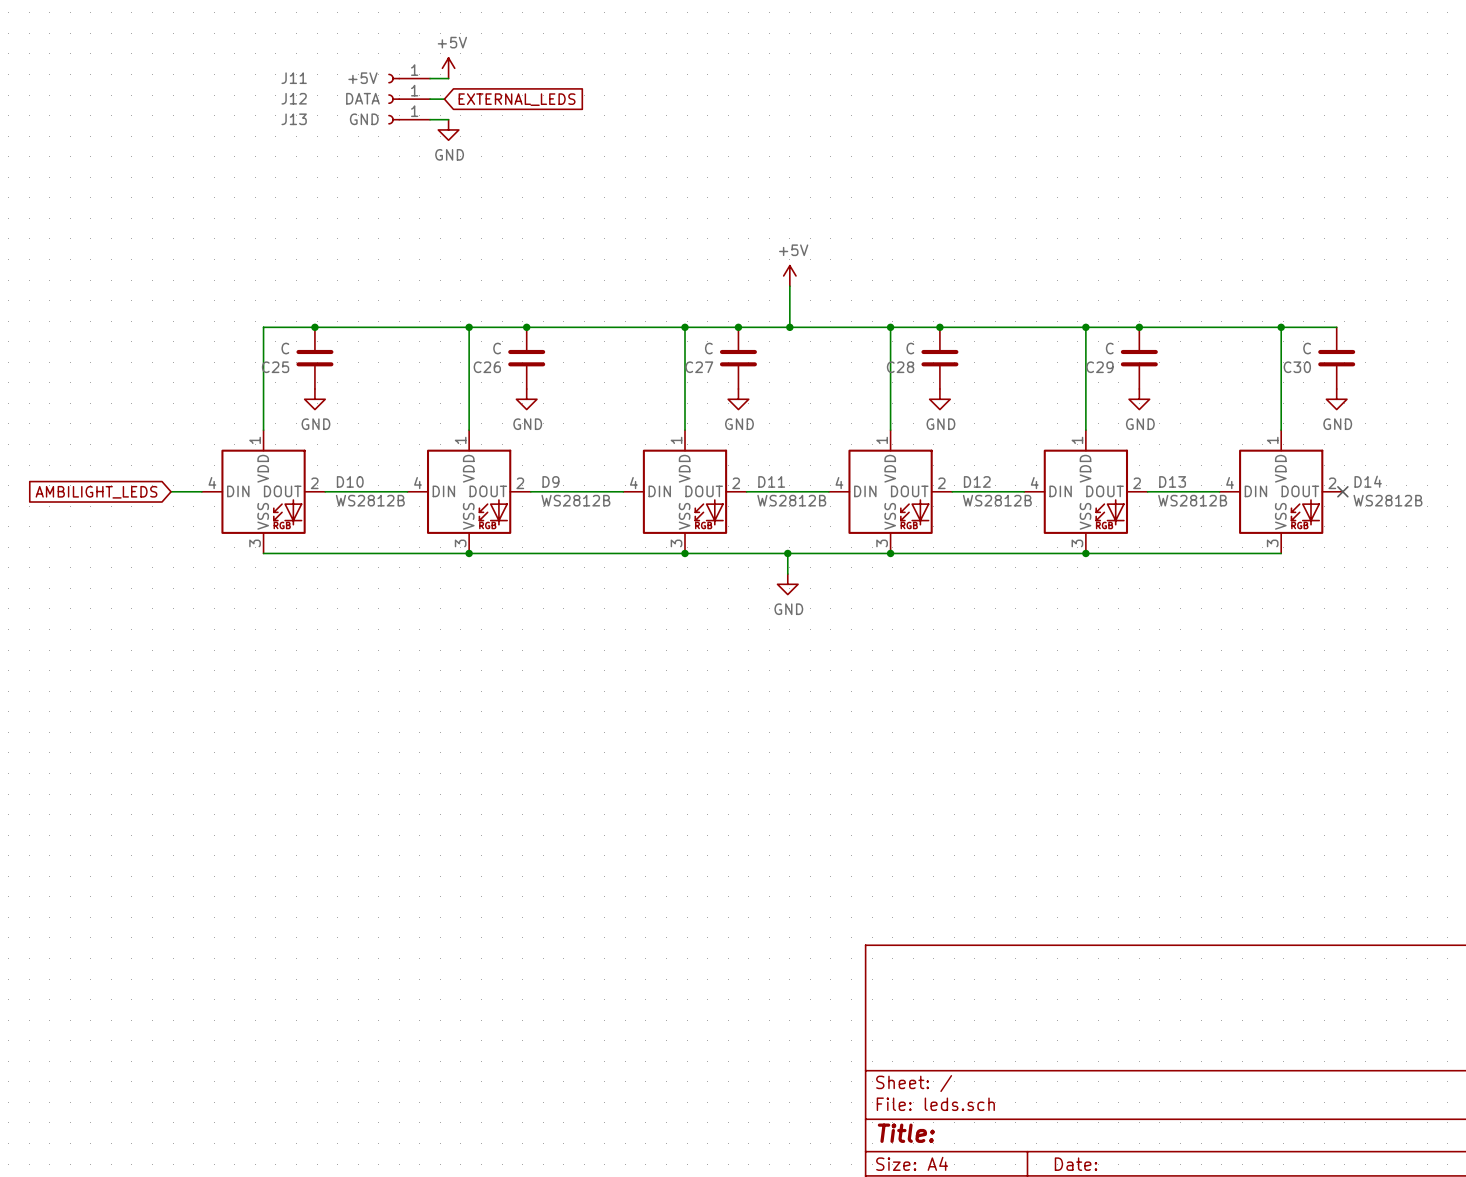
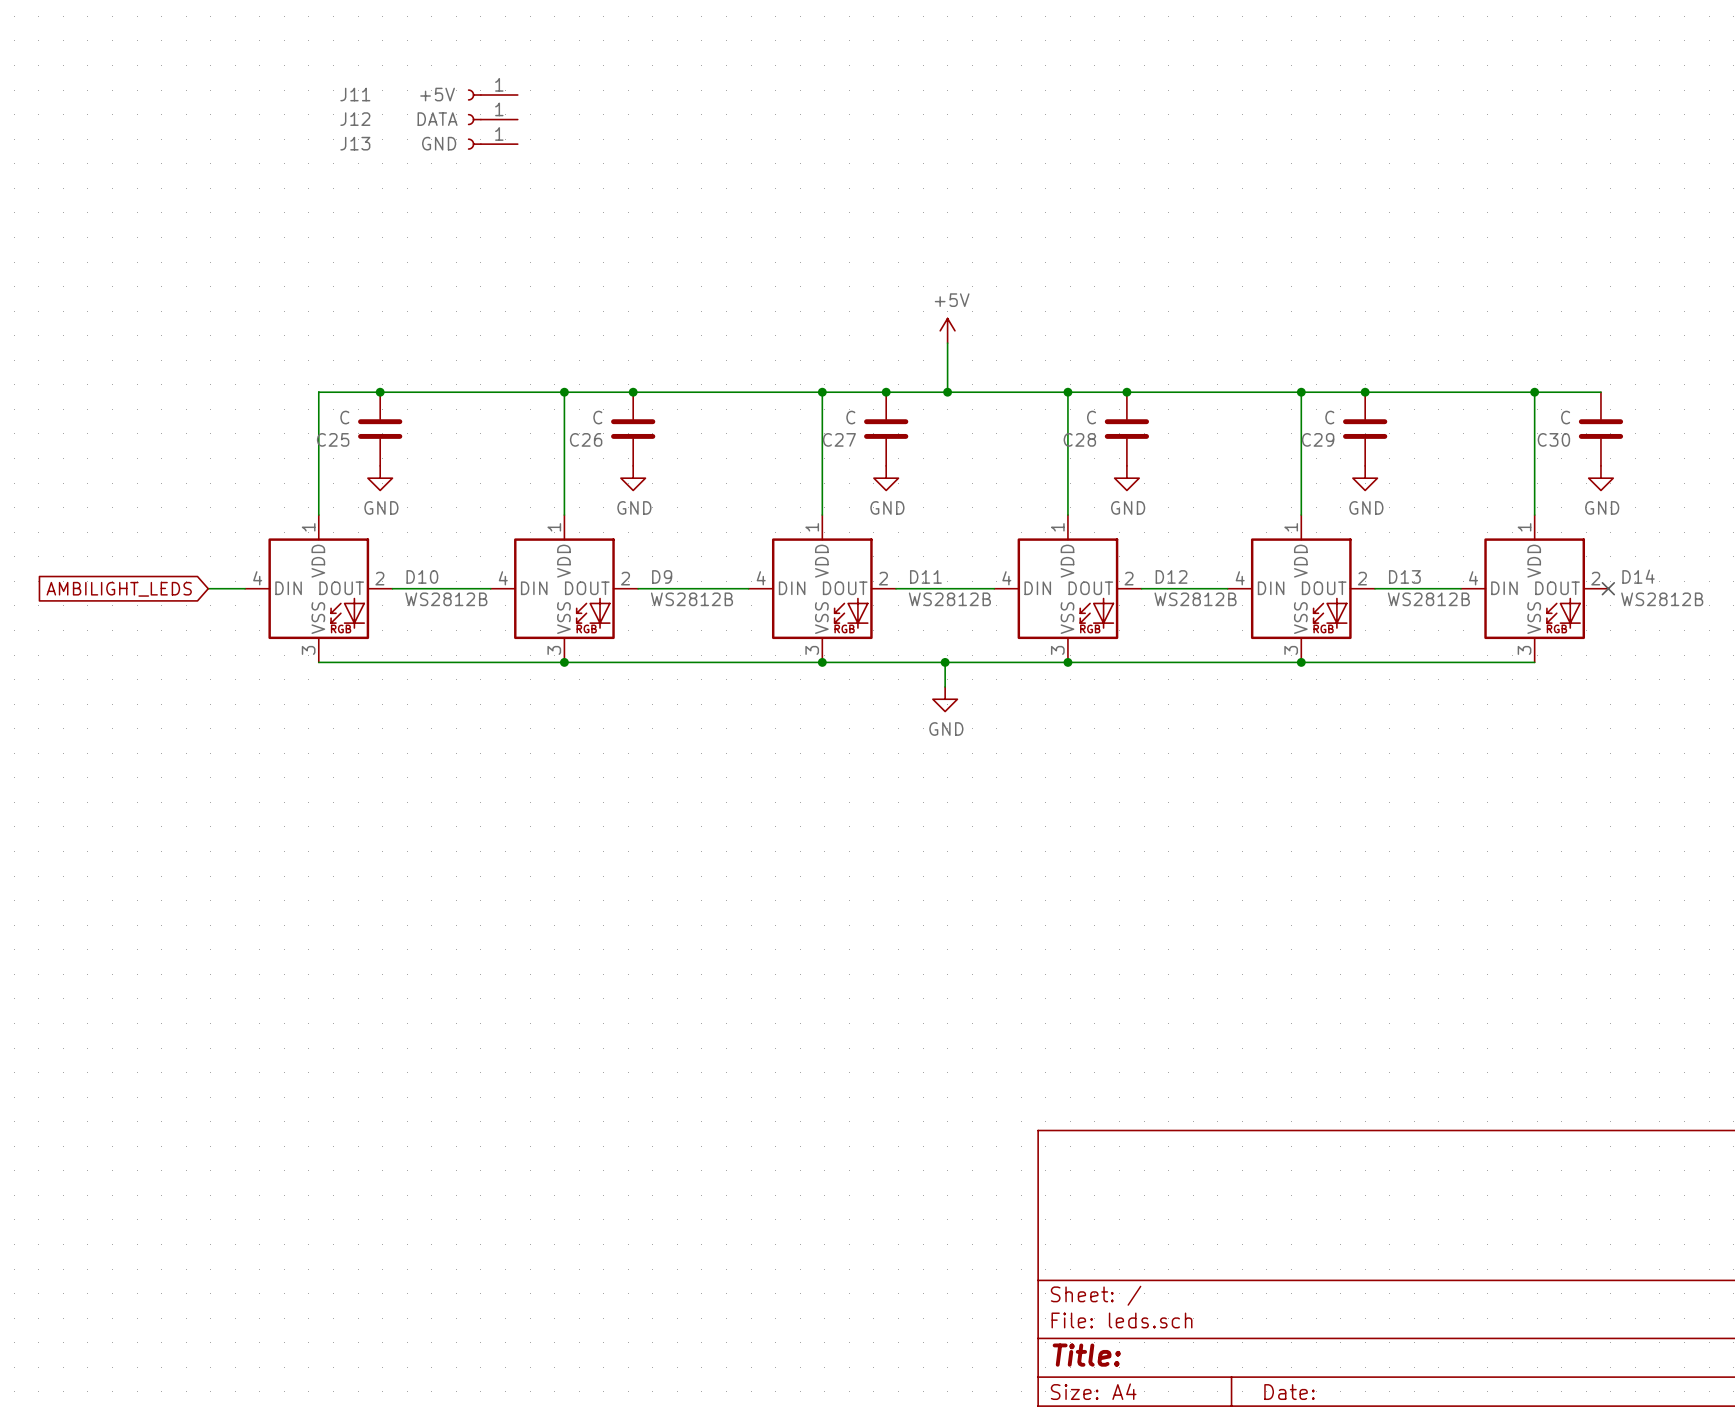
power symbol: +5V (448, 68) -> none
wire: (430, 78) (448, 78) -> none
wire: (430, 99) (444, 99) -> none
global label: EXTERNAL_LEDS (517, 99) -> none
wire: (430, 119) (448, 119) -> none
power symbol: GND (448, 129) -> none

